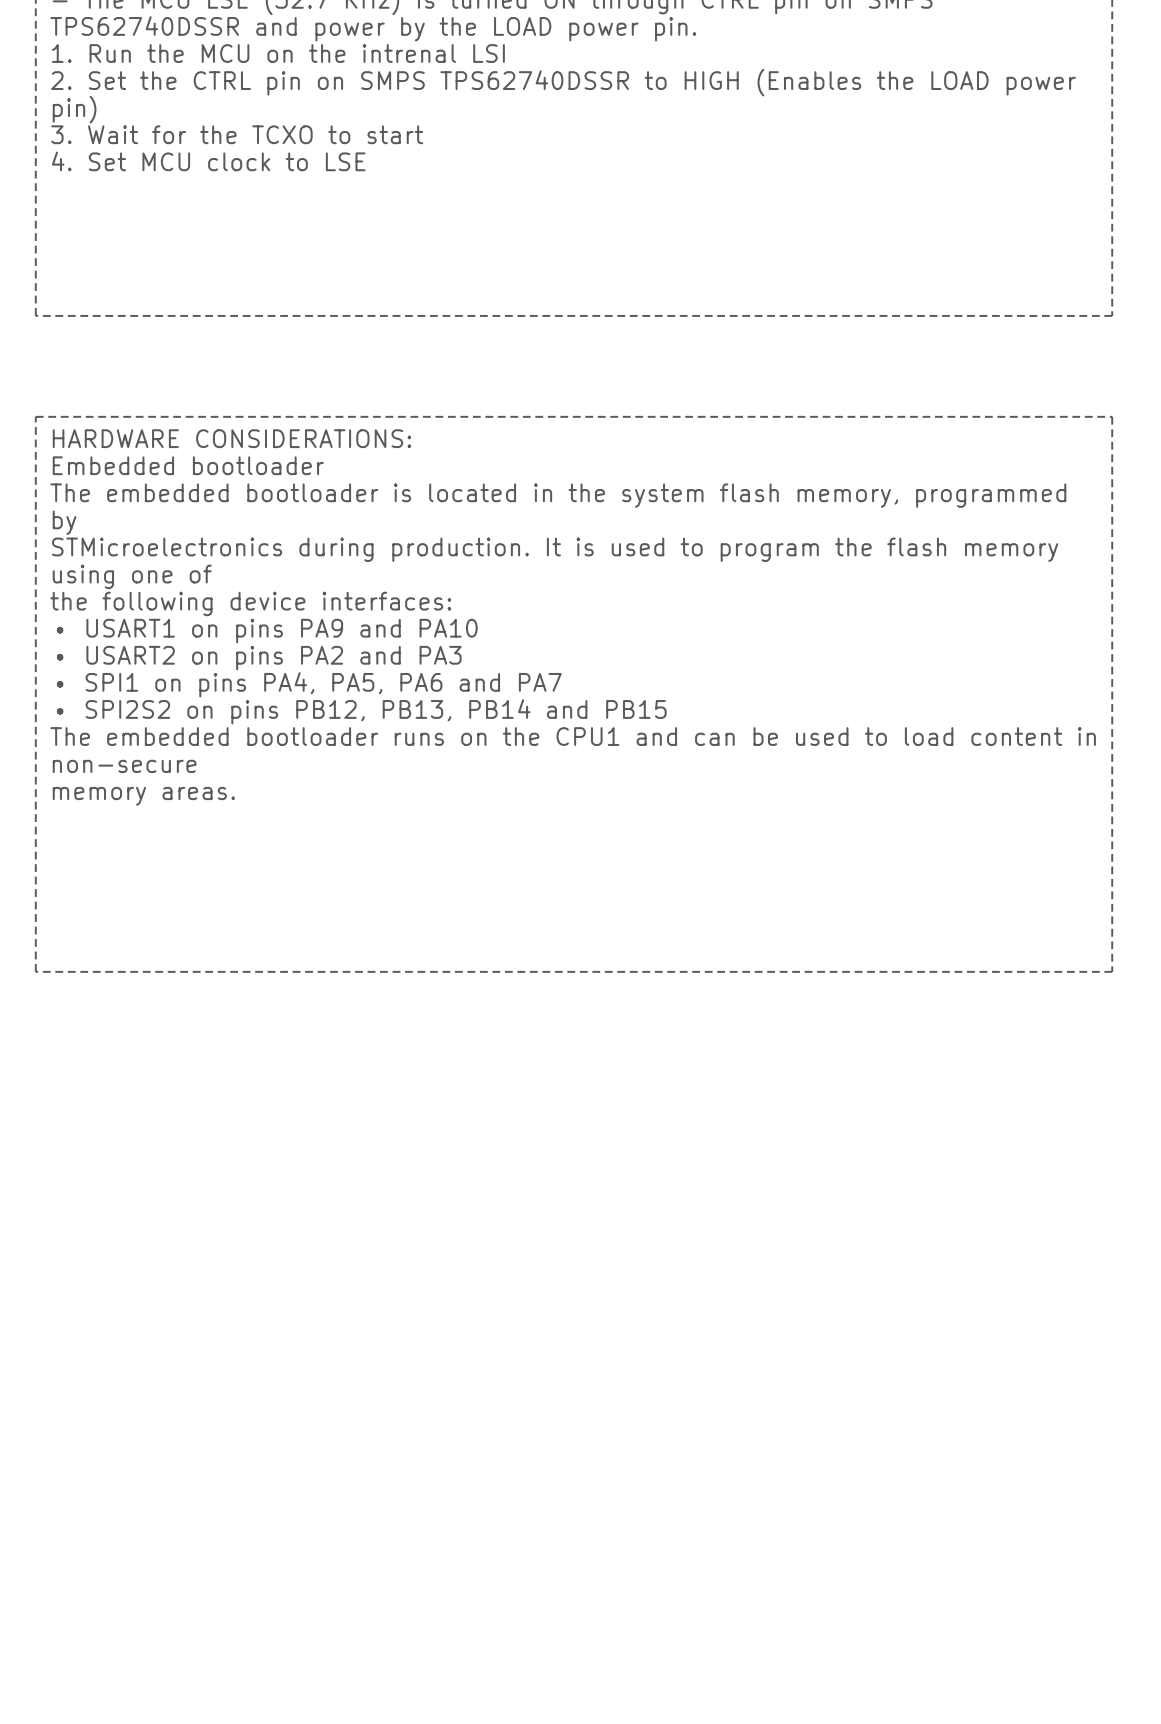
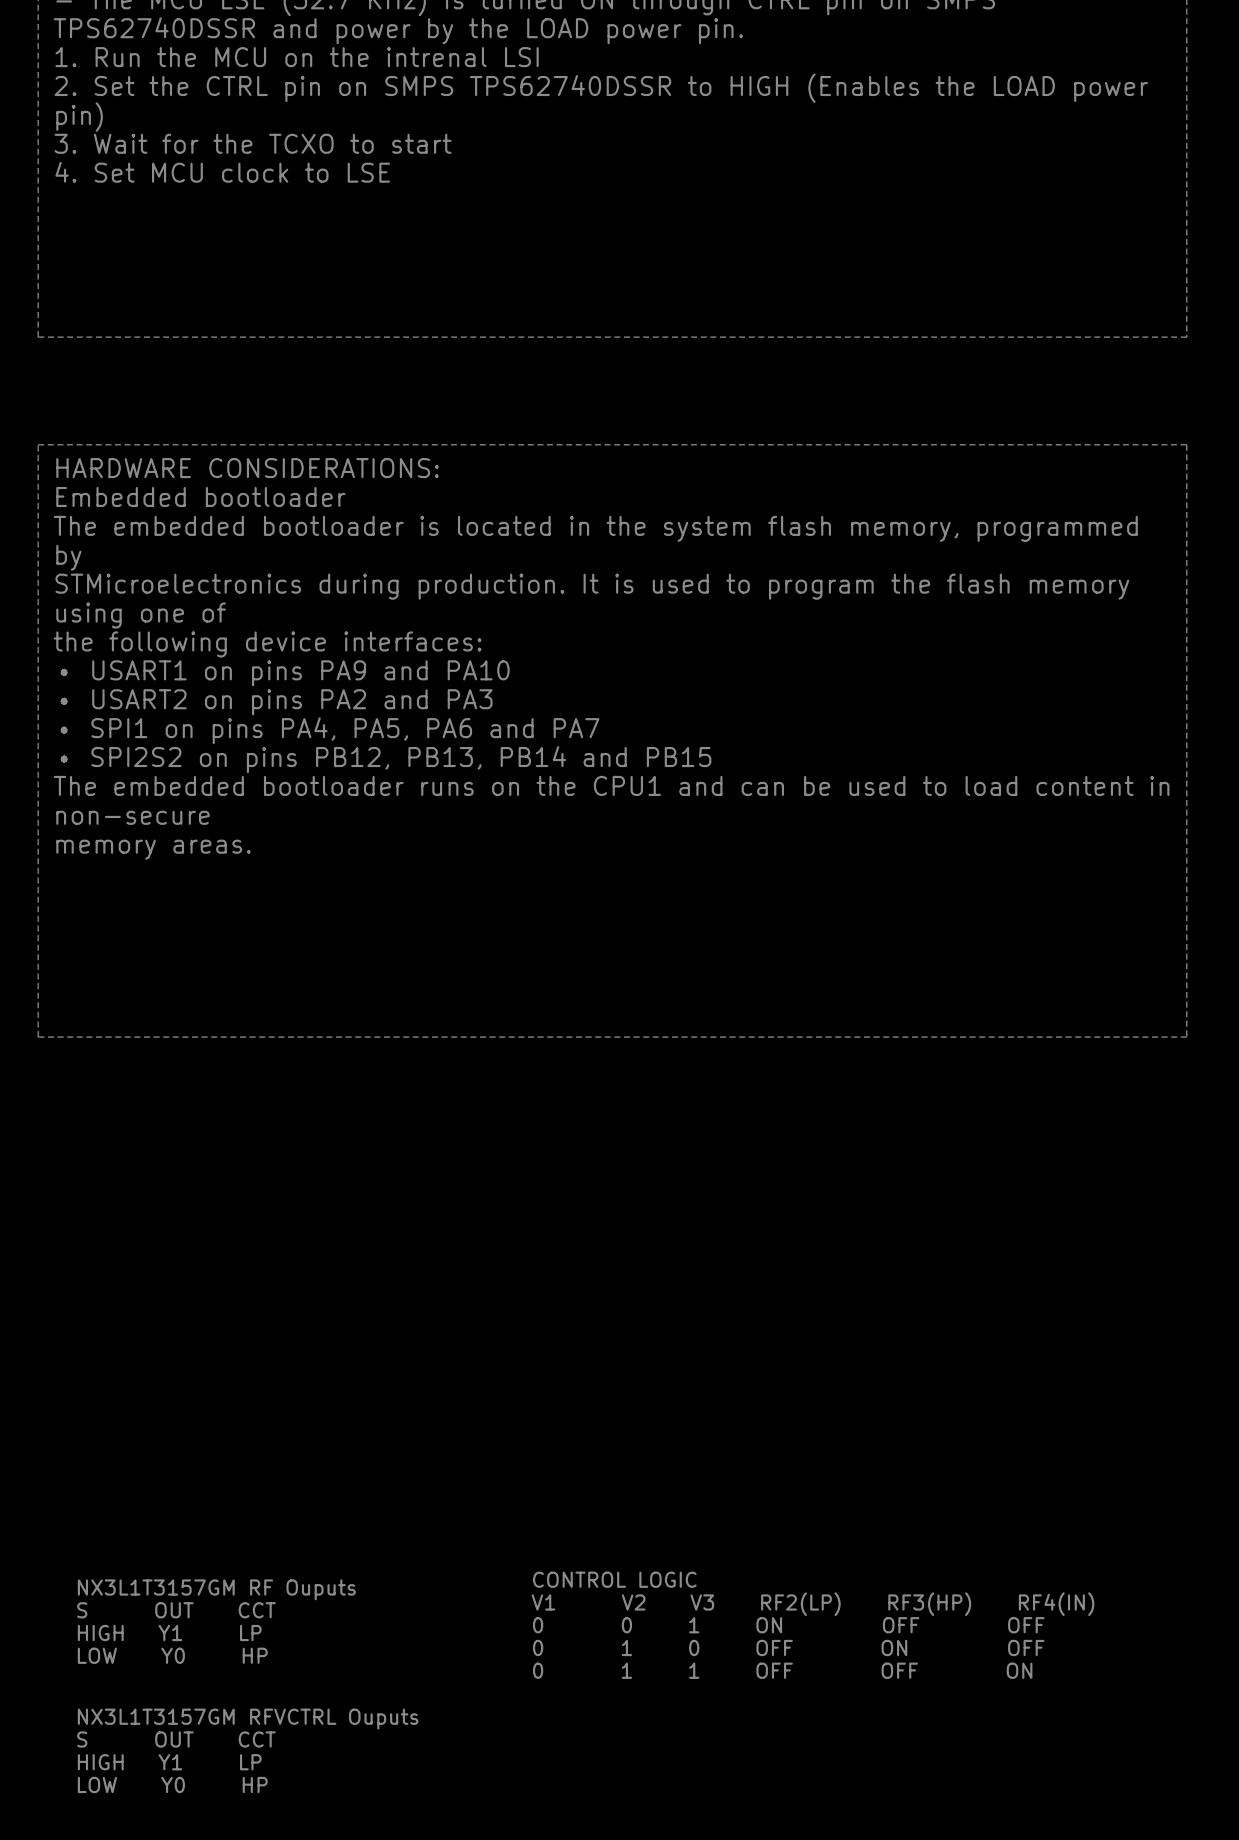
text: none -> CONTROL LOGIC (614, 1579)
text: none -> NX3L1T3157GM RF Ouputs (216, 1589)
text: none -> V1 V2 V3 RF2(LP) RF3(HP) RF4(IN) (812, 1604)
text: none -> S OUT CCT (176, 1610)
text: none -> 0 0 1 ON OFF OFF (788, 1625)
text: none -> HIGH Y1 LP (169, 1633)
text: none -> 0 1 0 OFF ON OFF (788, 1647)
text: none -> LOW Y0 HP (172, 1655)
text: none -> 0 1 1 OFF OFF ON (782, 1670)
text: none -> NX3L1T3157GM RFVCTRL Ouputs (248, 1719)
text: none -> S OUT CCT (176, 1739)
text: none -> HIGH Y1 LP (169, 1762)
text: none -> LOW Y0 HP (172, 1784)

